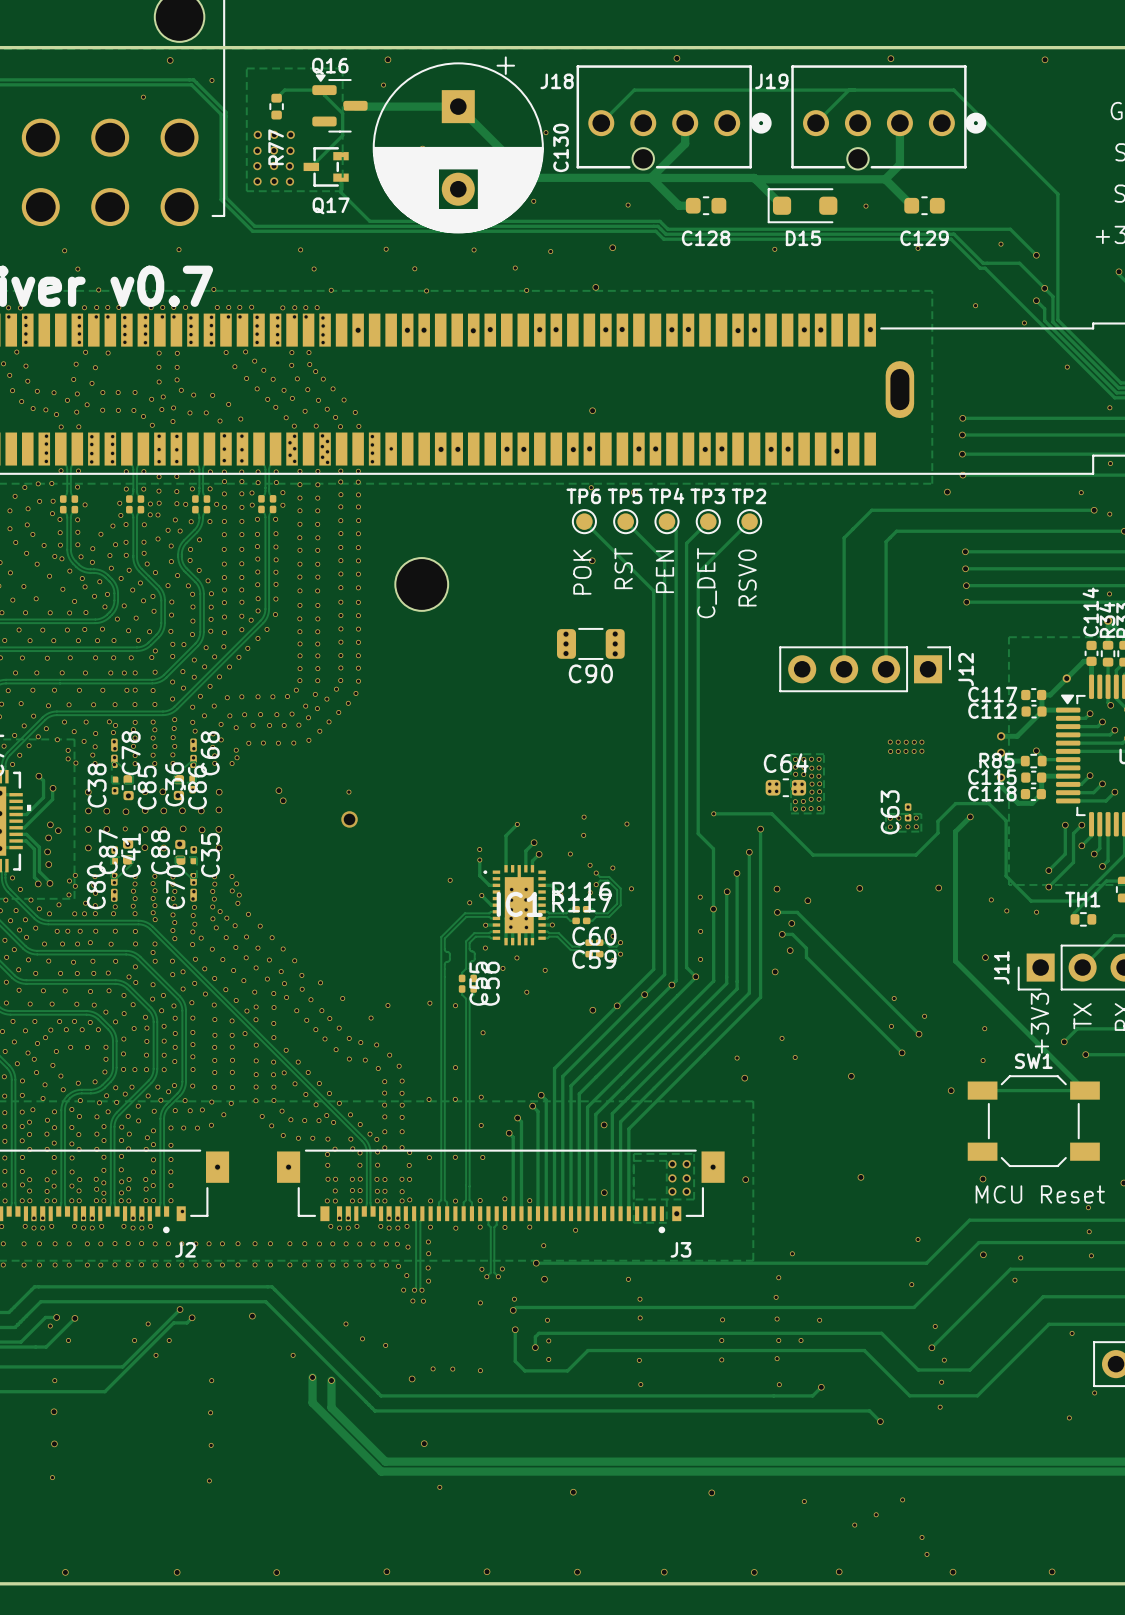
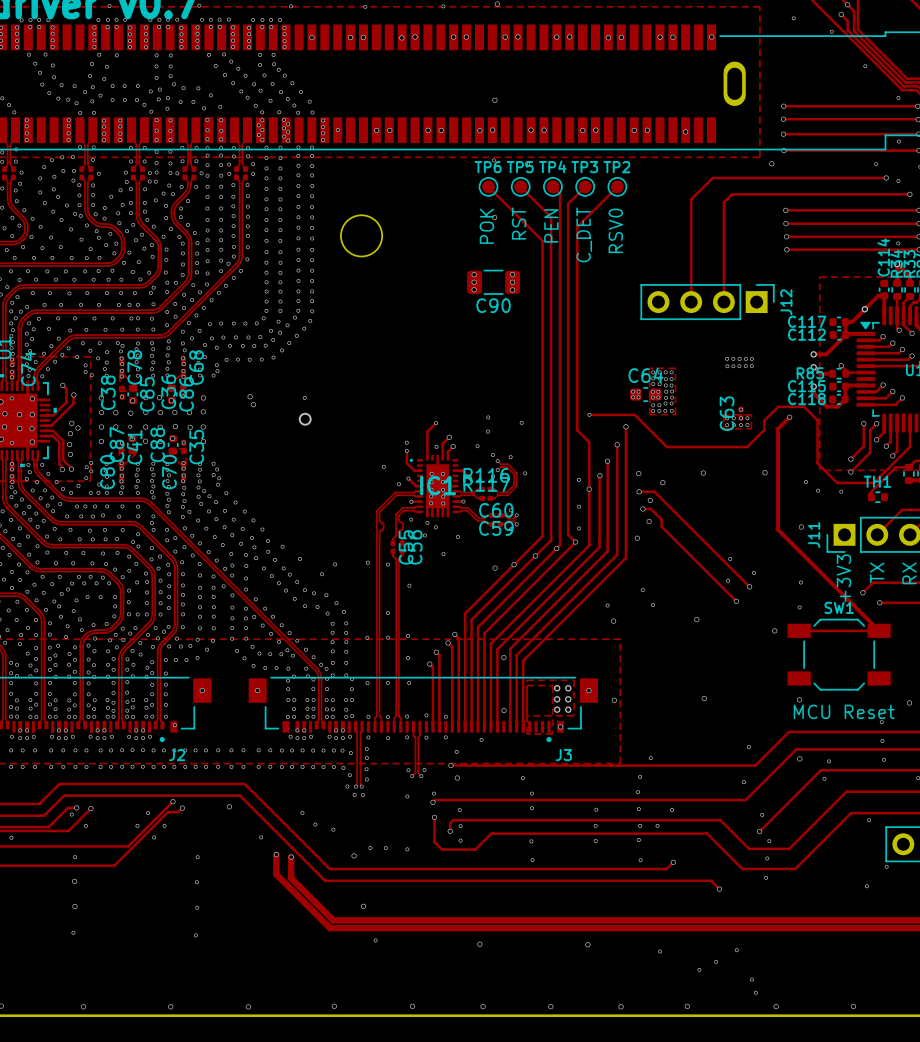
via: none -> (436, 446)
via: none -> (427, 522)

